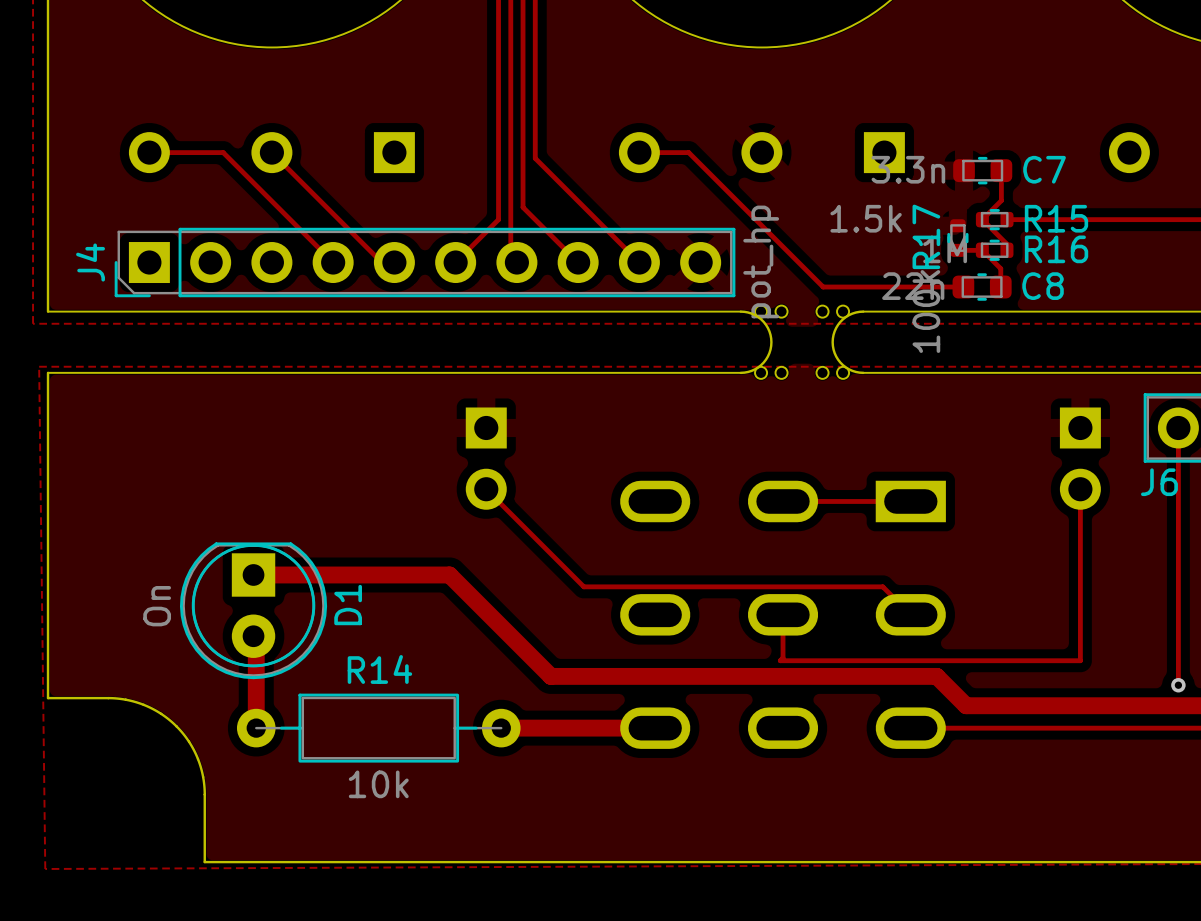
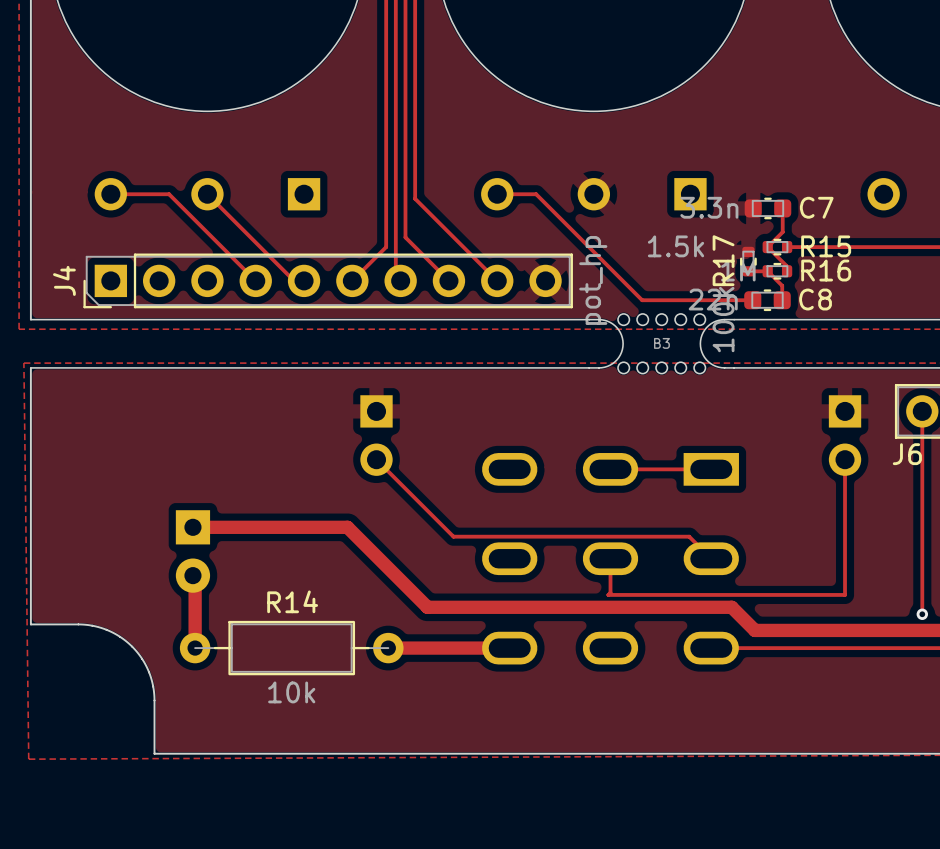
board edge: none -> (577, 319) (589, 319)
board edge: (863, 311) (939, 311) -> none
part: (802, 342) -> none
B3: none -> (661, 343)
board edge: none -> (577, 367) (589, 367)
board edge: (863, 372) (939, 372) -> none
D1 side: top (253, 610) -> bottom (192, 551)

